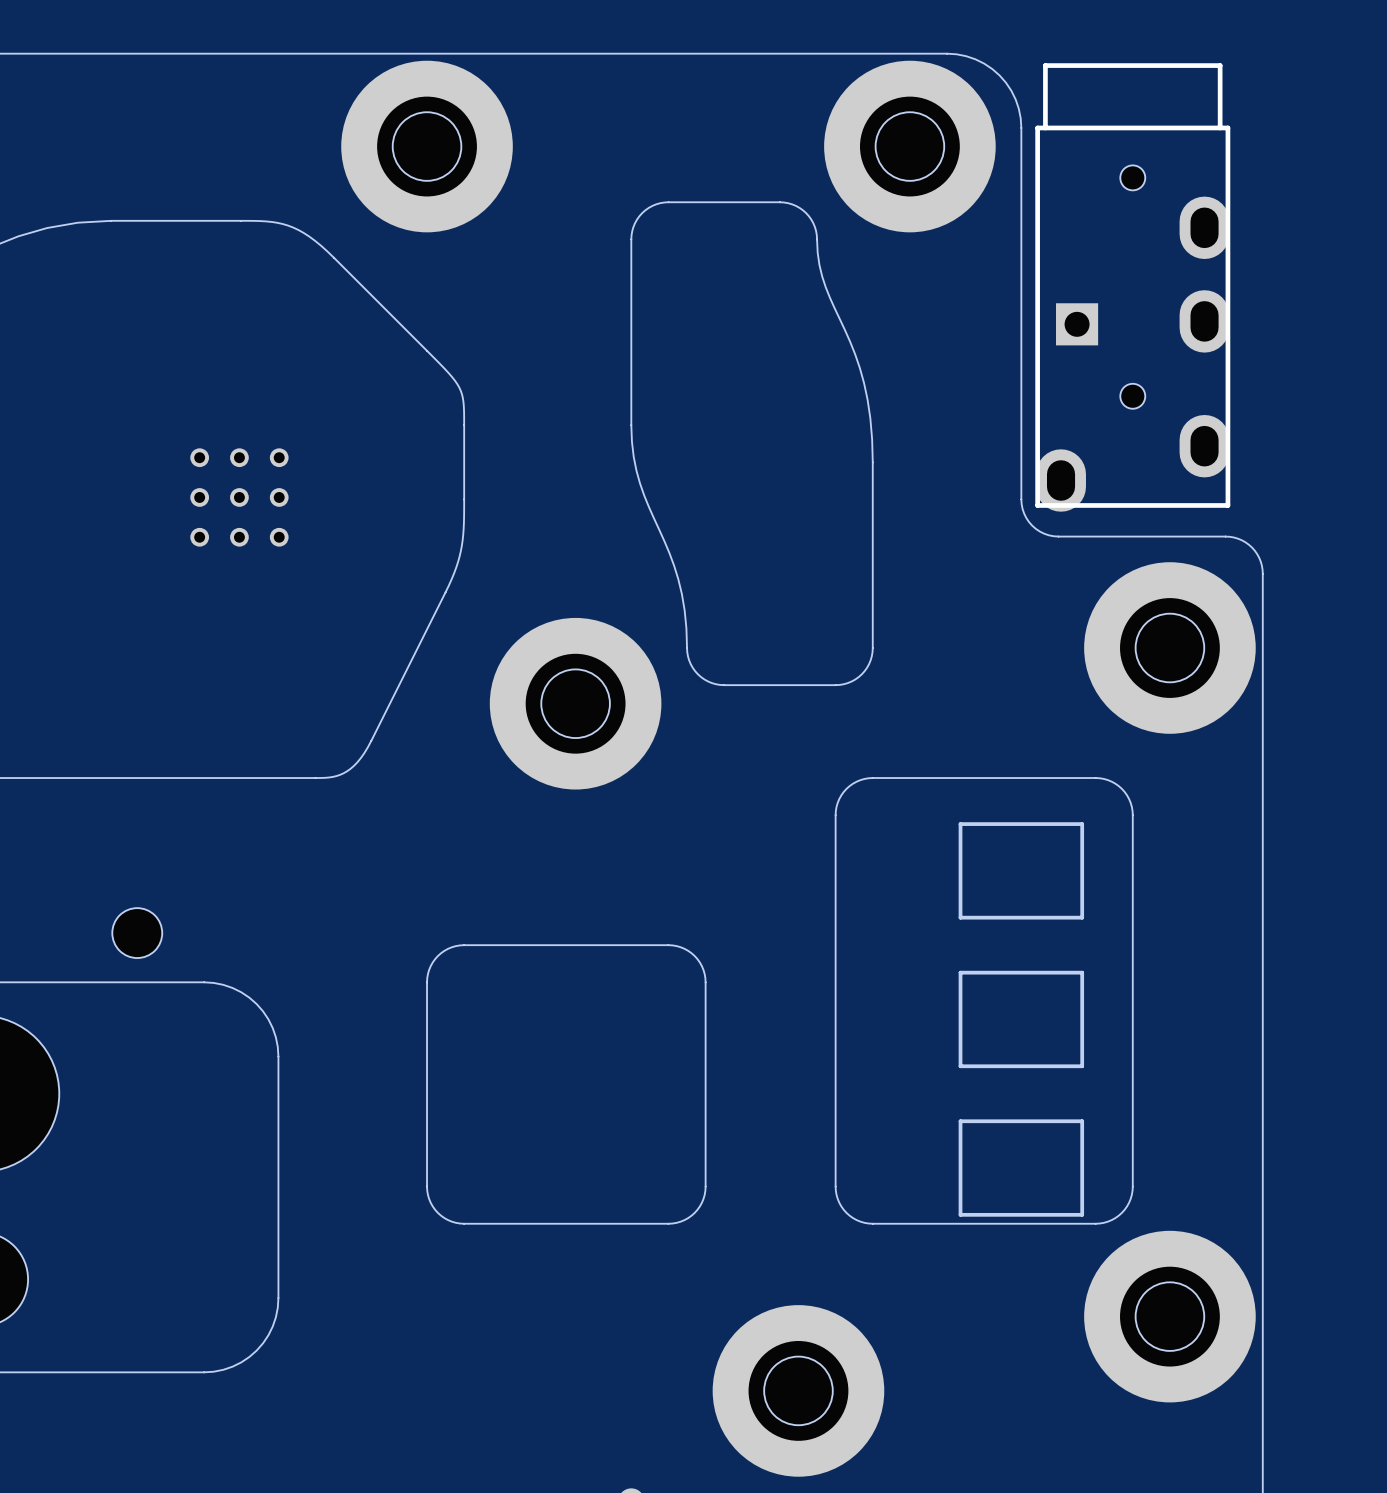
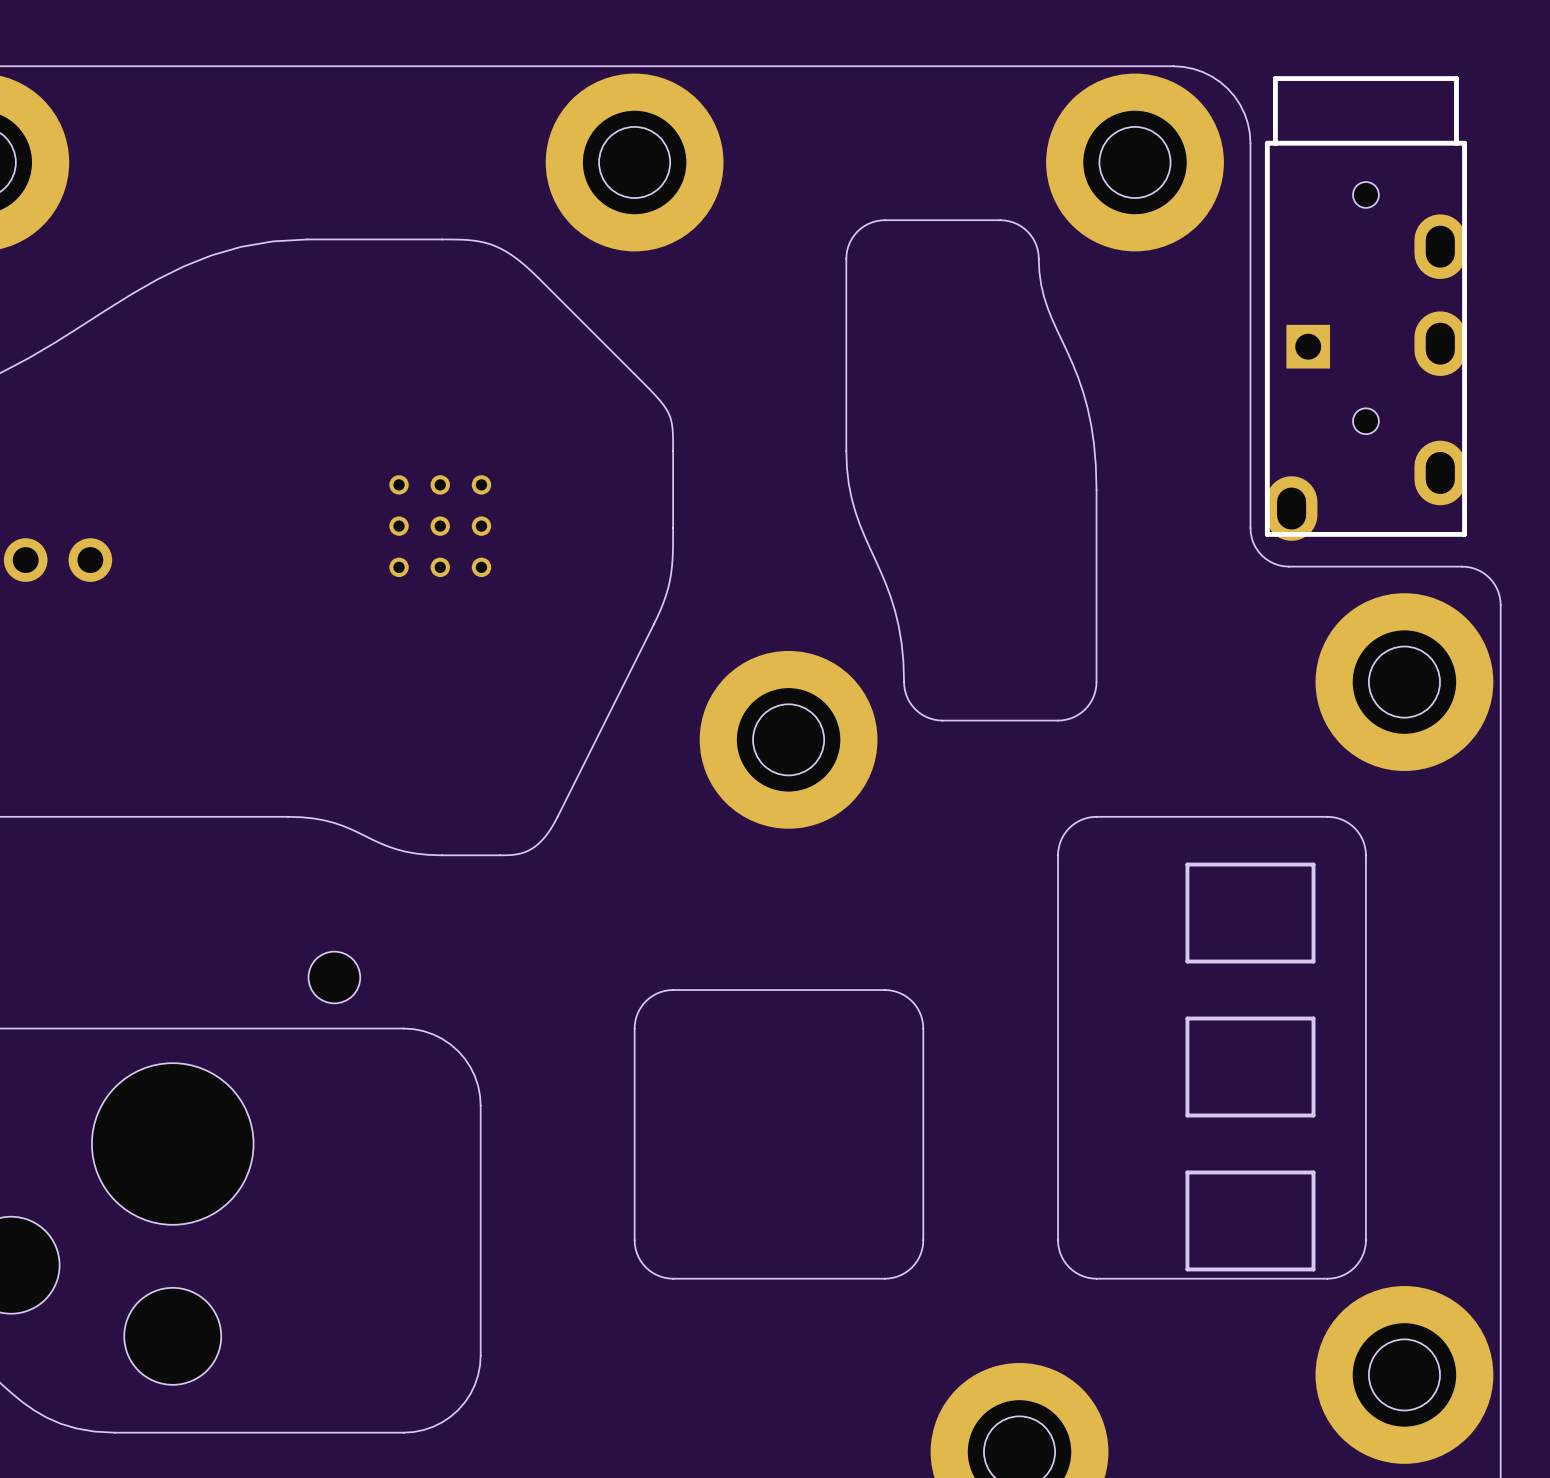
board edge: (371, 740) (353, 765) (343, 773) (329, 777) (92, 778) -> (576, 778) (554, 823) (543, 839) (528, 850) (514, 854) (416, 853) (387, 846) (333, 822) (313, 818) (288, 816)

